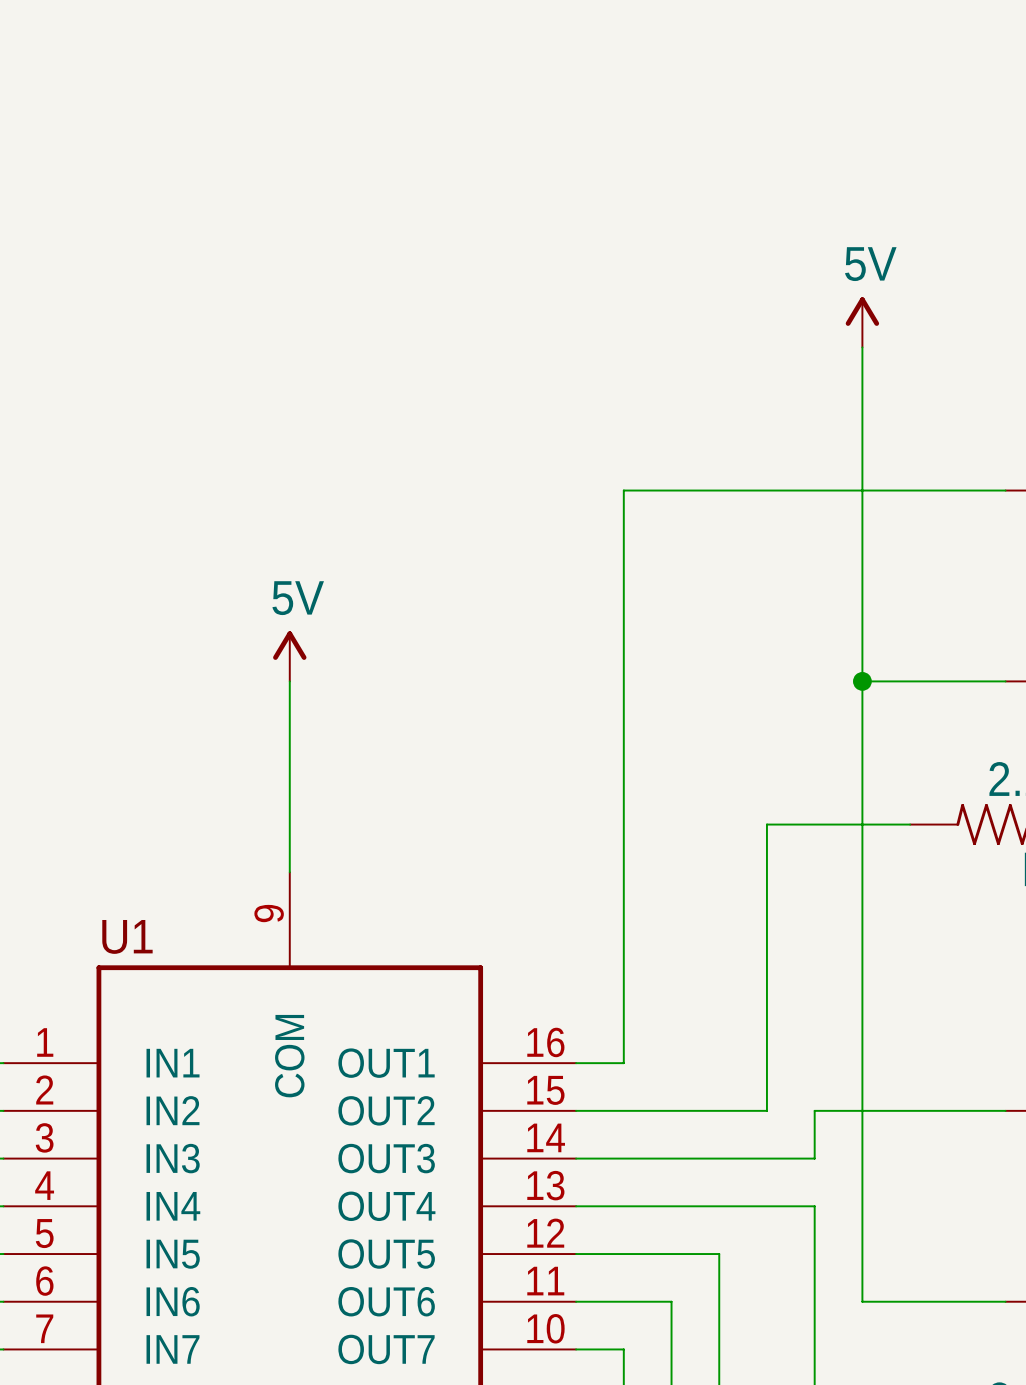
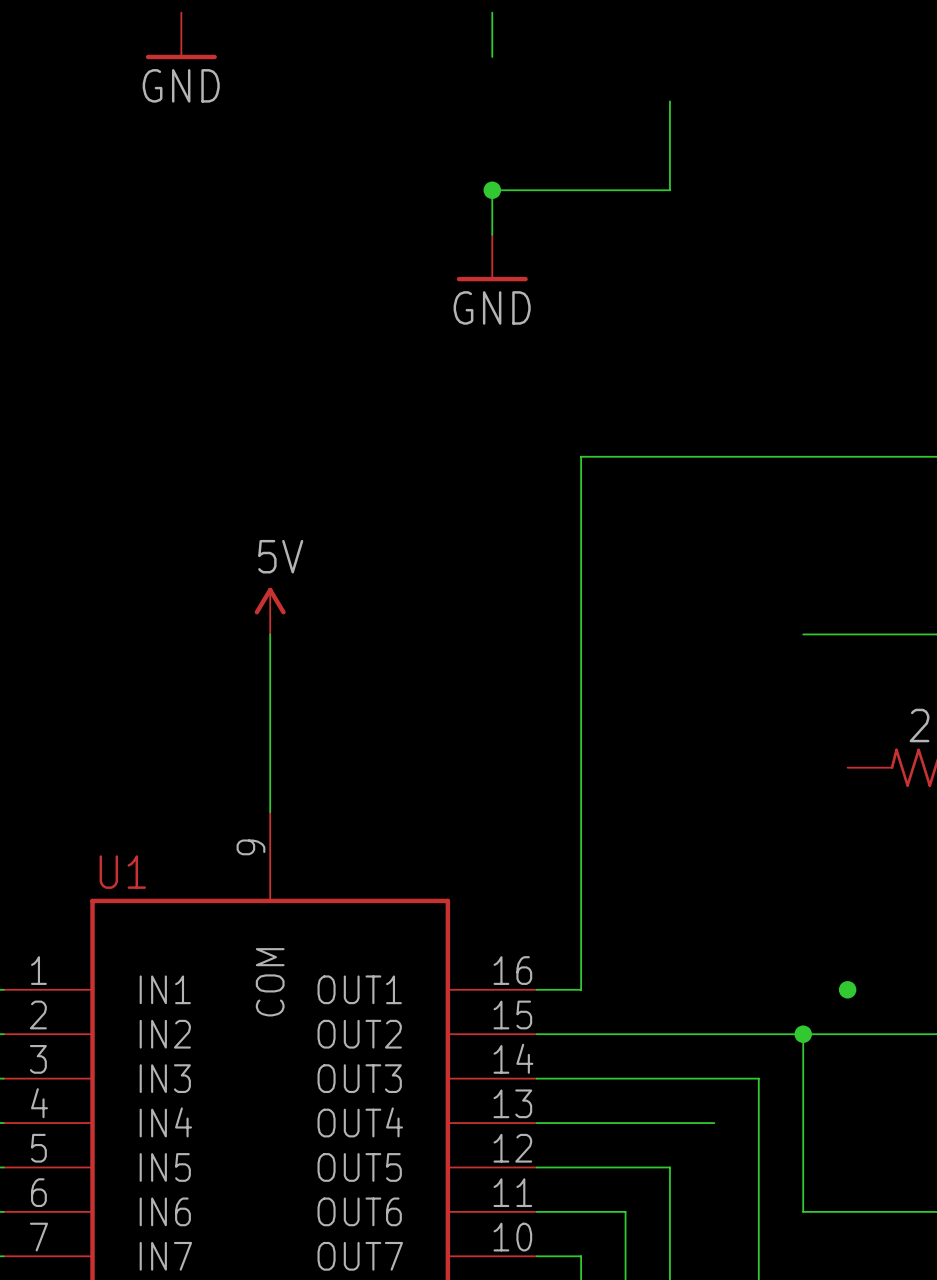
wire: none -> (492, 12) (492, 56)
power symbol: none -> GND (181, 35)
wire: none -> (669, 101) (669, 190) (492, 190) (492, 234)
junction: none -> (492, 190)
power symbol: none -> GND (492, 257)
power symbol: 5V (862, 322) -> none
wire: (862, 347) (862, 1110) -> none
junction: (862, 681) -> none
wire: (910, 824) (766, 824) (766, 1110) -> none
junction: none -> (847, 989)
wire: (814, 1110) (814, 1158) -> (758, 1034) (714, 1034)
junction: none -> (803, 1034)
wire: (766, 1206) (814, 1206) -> (758, 1078) (758, 1123)

